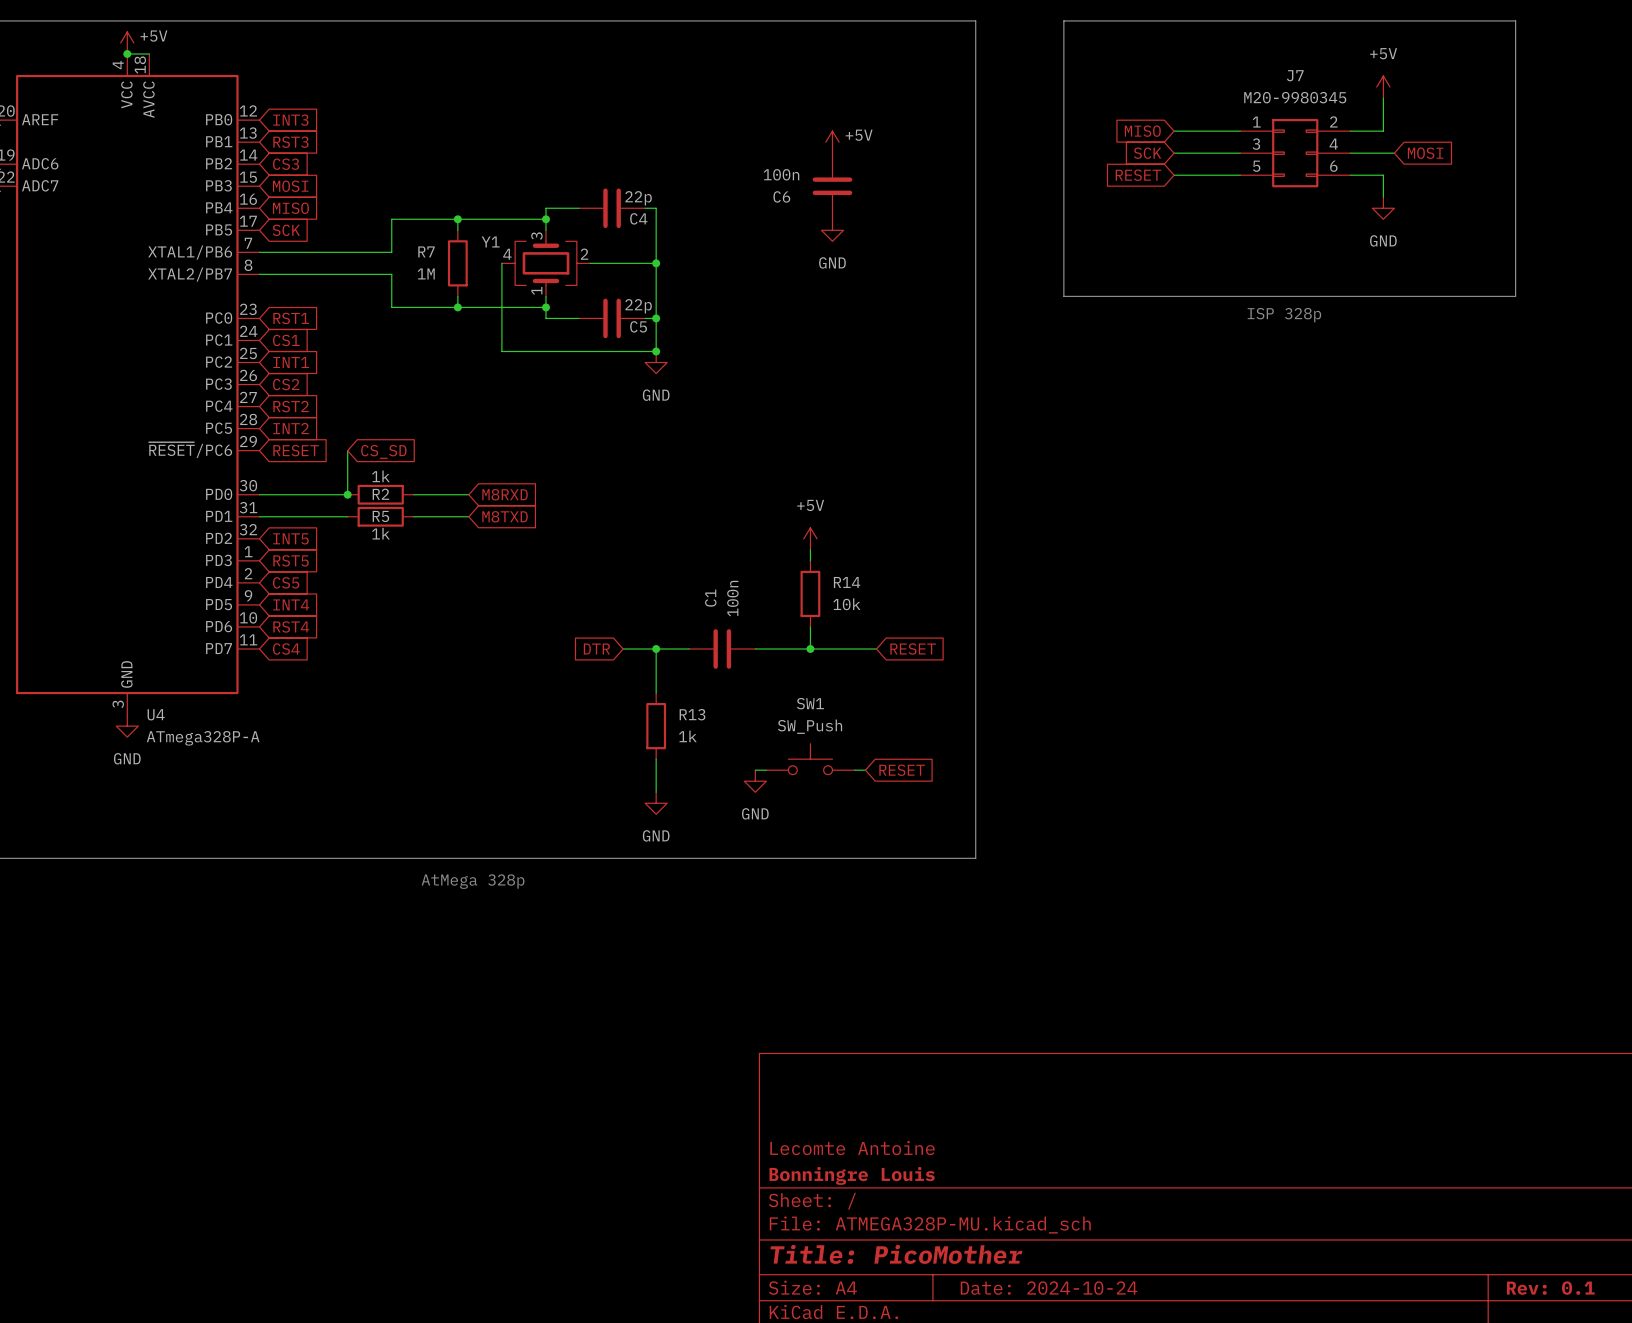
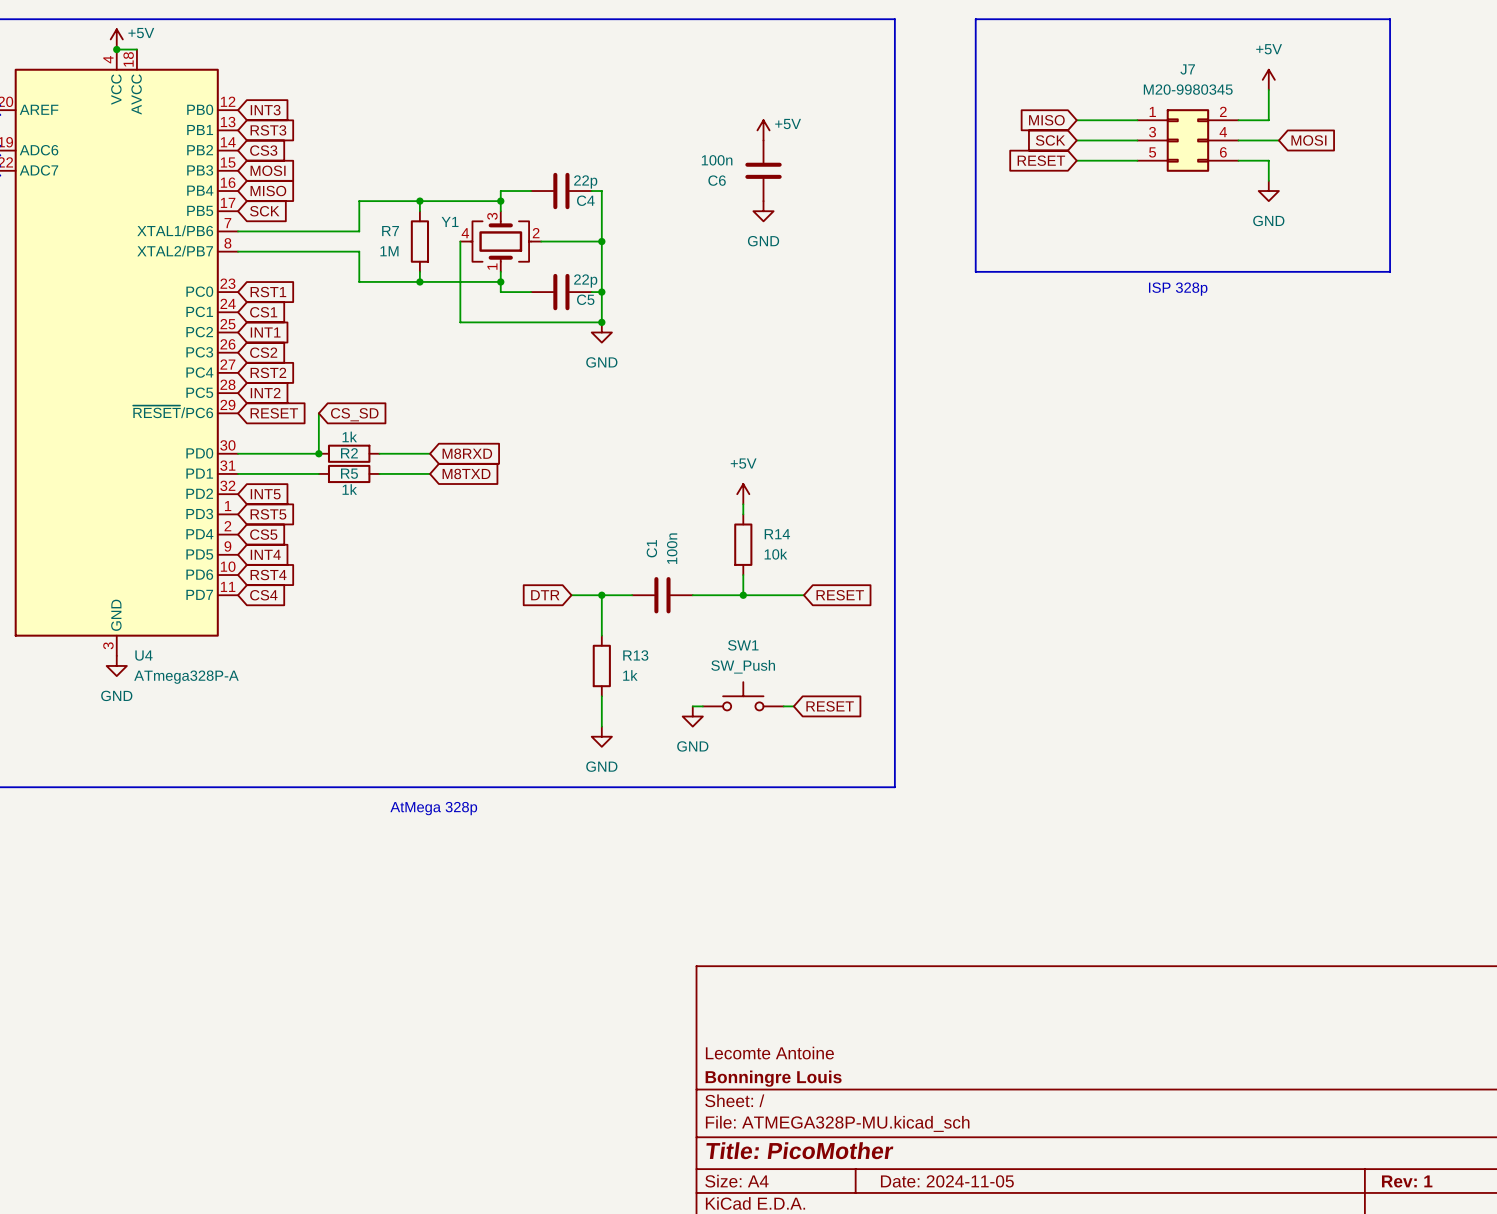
title block: Date: 2024-10-24 (1048, 1288) -> Date: 2024-11-05 (947, 1181)
title block: Rev: 0.1 (1550, 1288) -> Rev: 1 (1407, 1181)

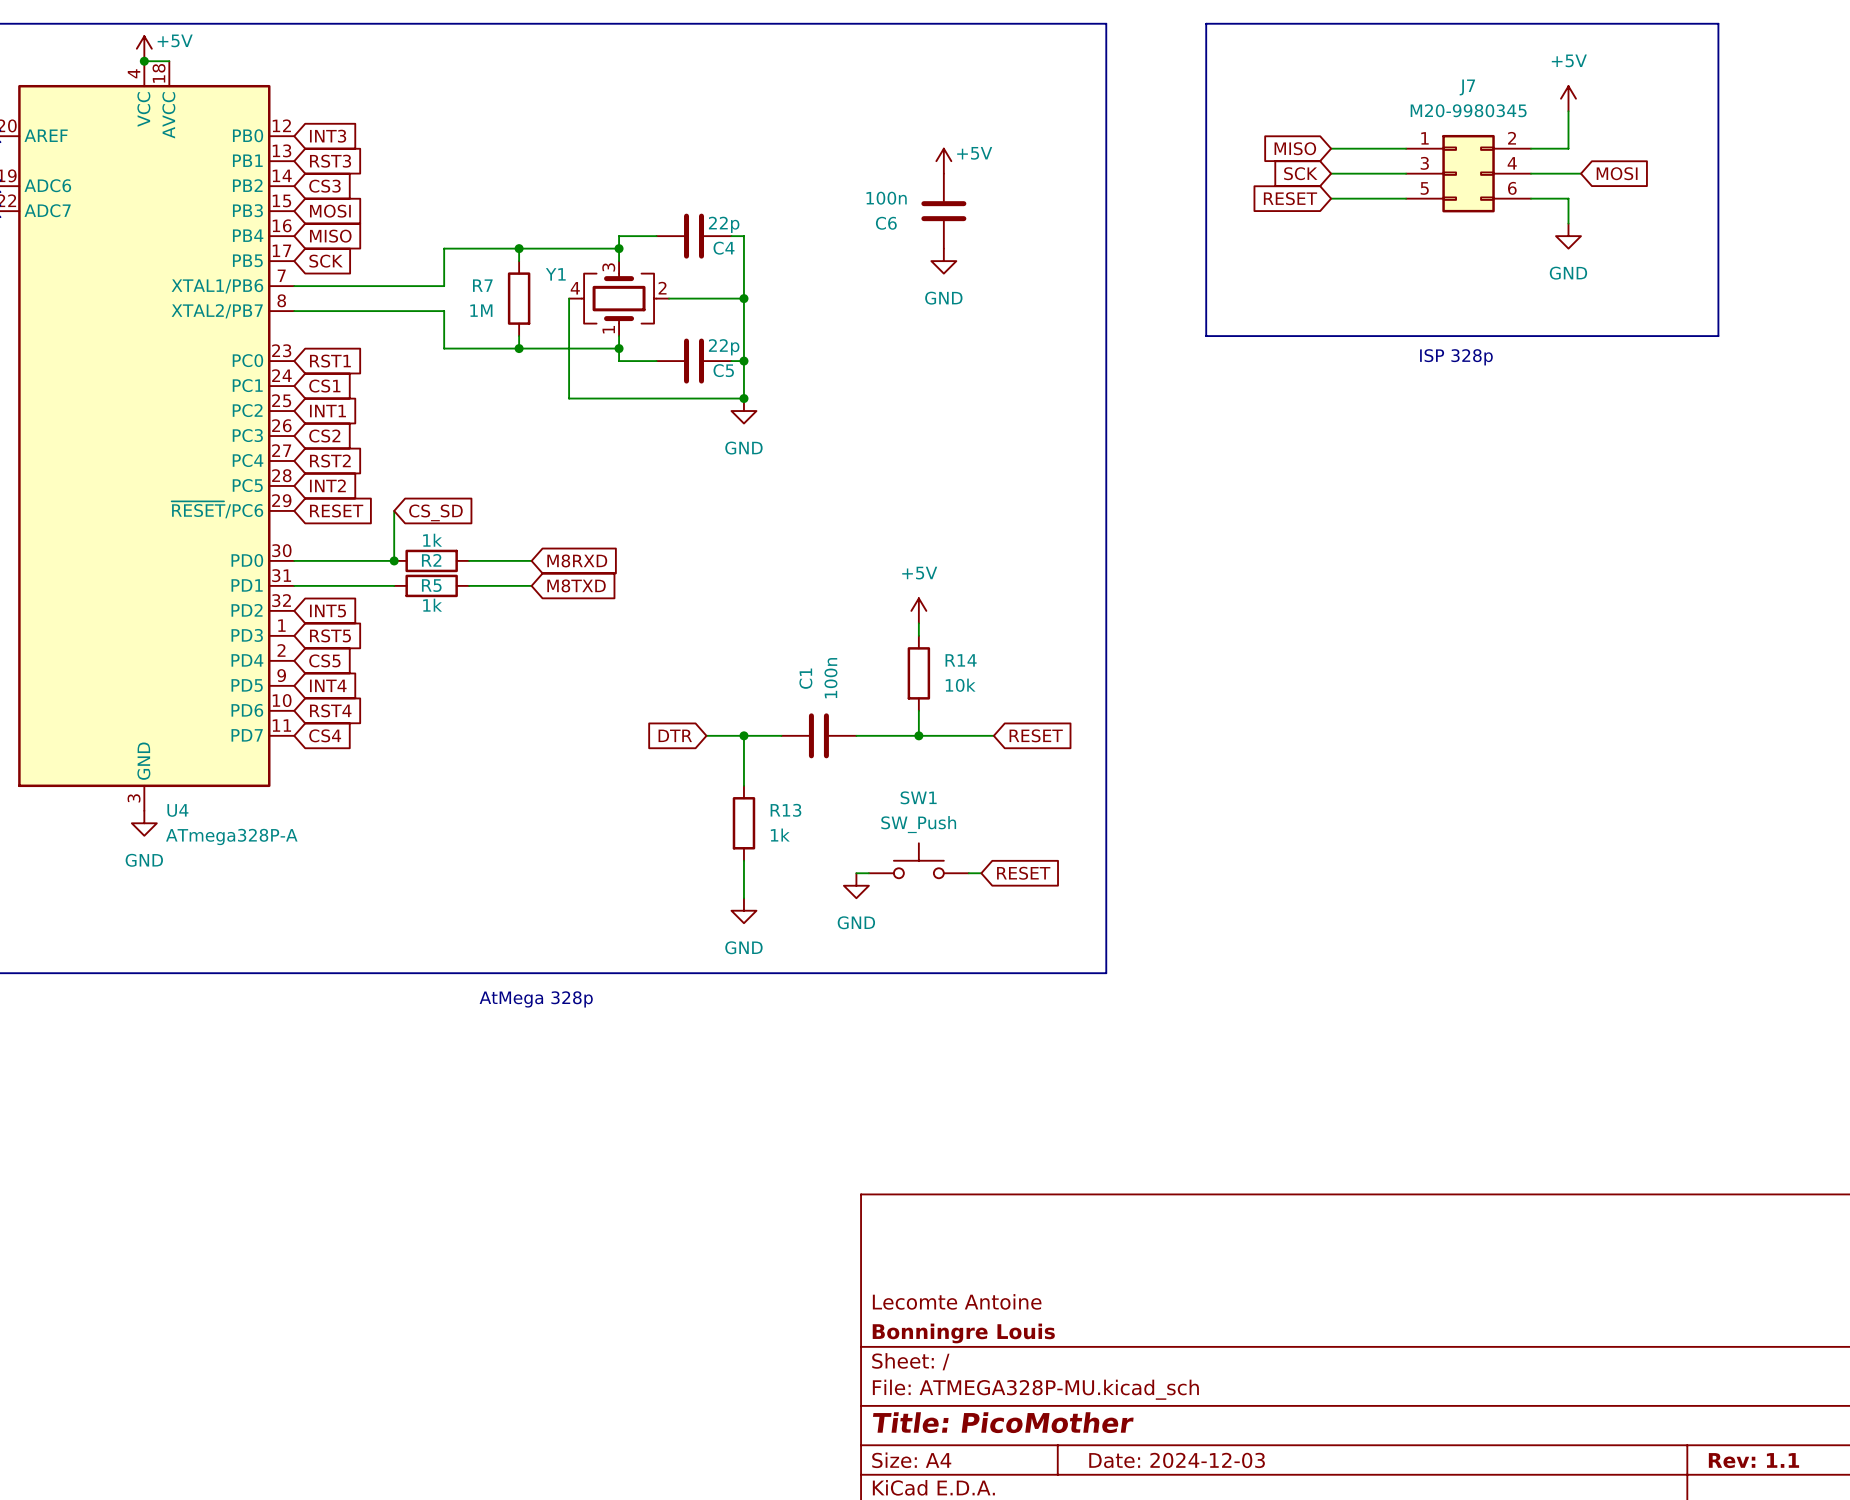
title block: Date: 2024-11-05 (947, 1181) -> Date: 2024-12-03 (1177, 1460)
title block: Rev: 1 (1407, 1181) -> Rev: 1.1 (1753, 1460)

